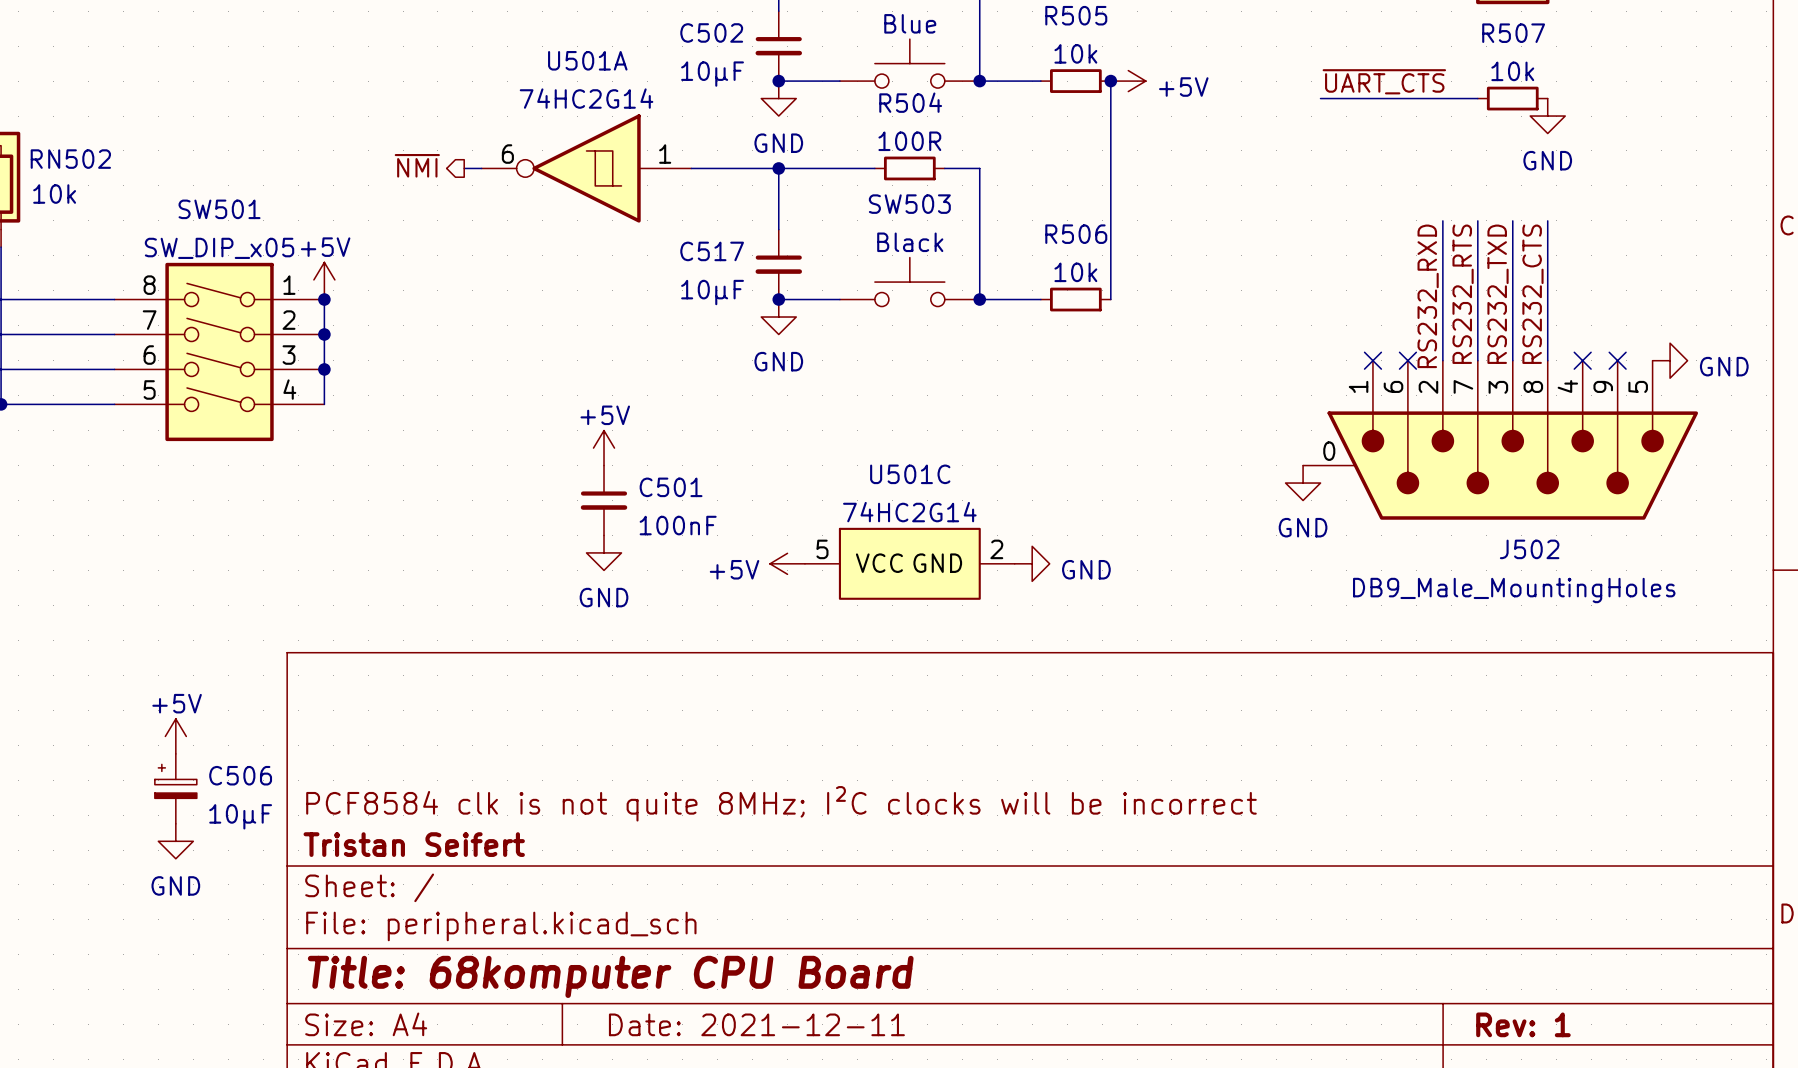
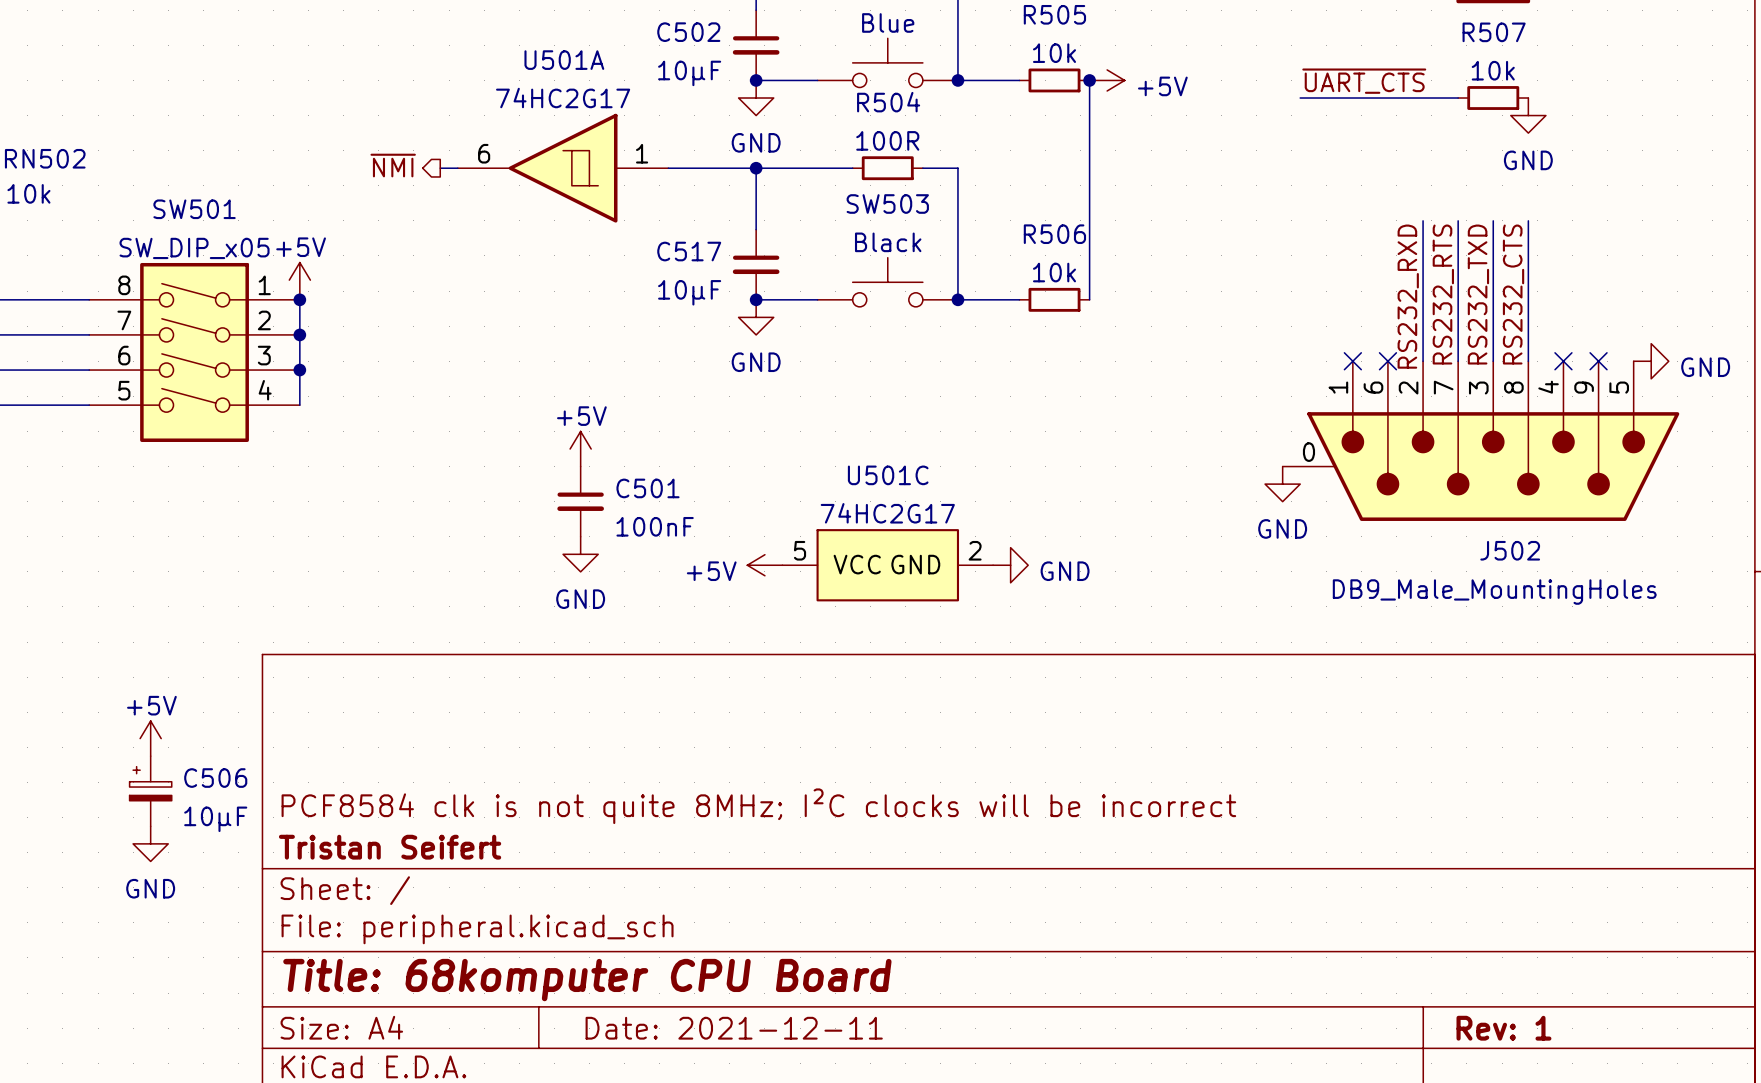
U501A value: 74HC2G14 (586, 98) -> 74HC2G17 (563, 98)
U501A symbol: [481, 114, 692, 223] -> [457, 113, 669, 223]
U501C value: 74HC2G14 (909, 512) -> 74HC2G17 (887, 513)

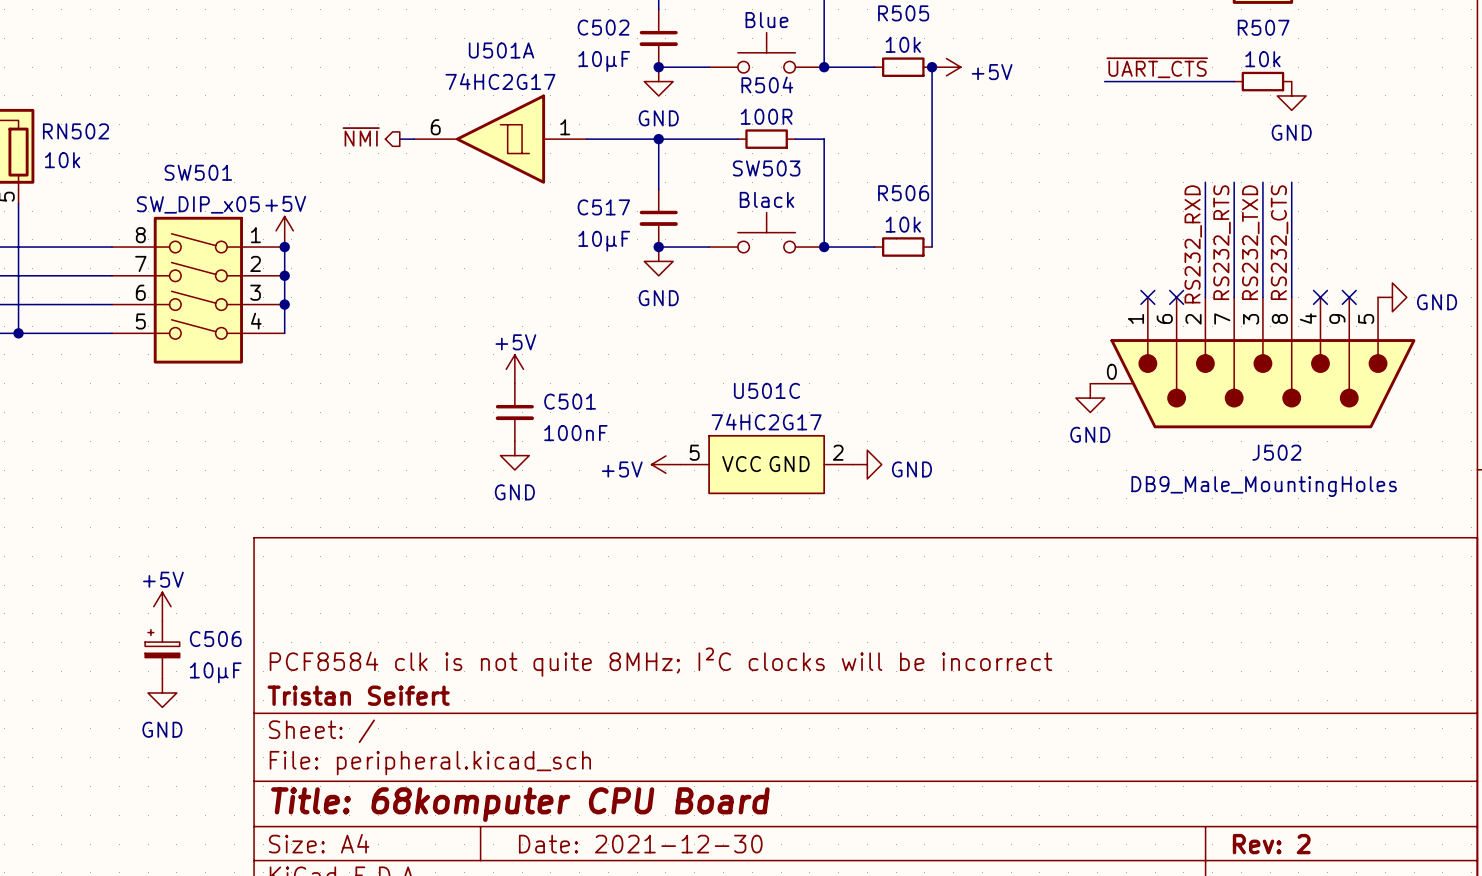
title block: Date: 2021-12-11 (734, 1028) -> Date: 2021-12-30 (640, 844)
title block: Rev: 1 (1503, 1028) -> Rev: 2 (1271, 844)

